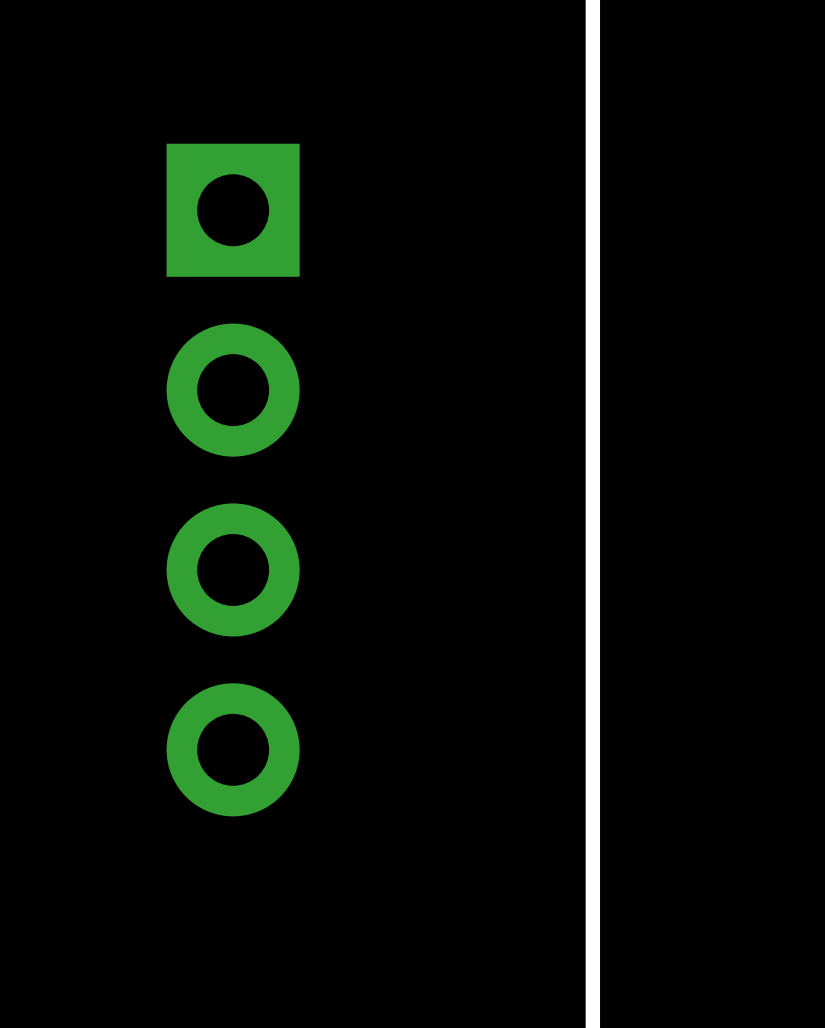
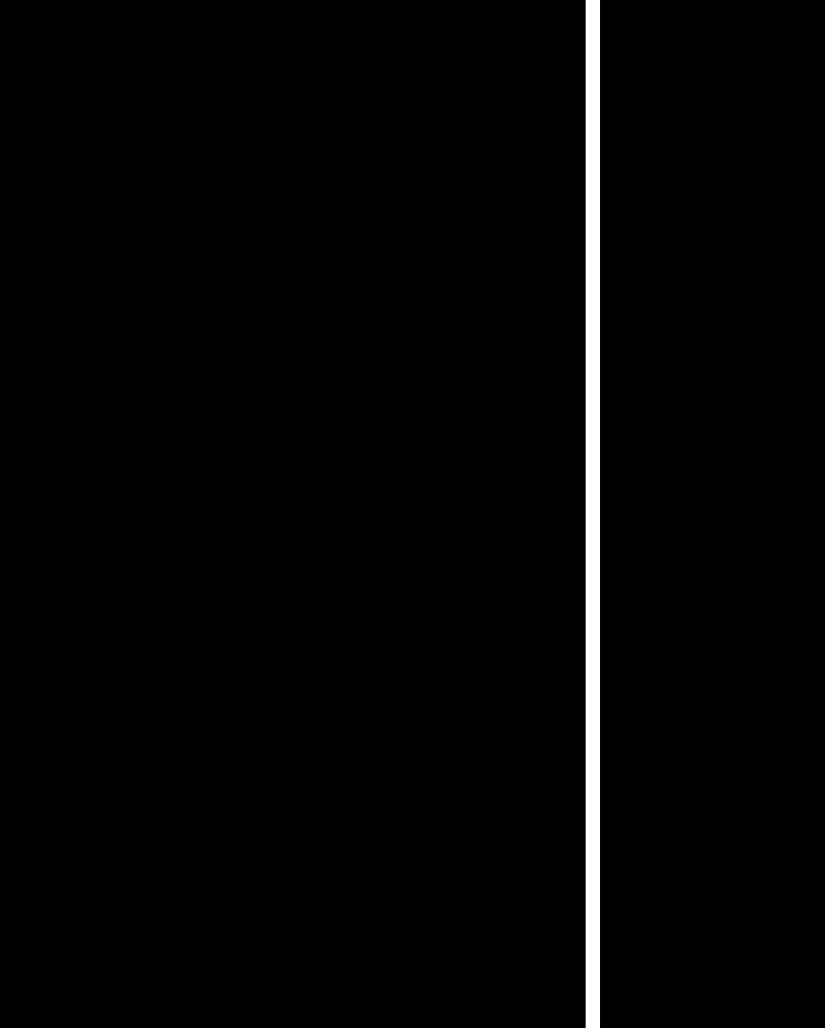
part: (233, 480) -> none

